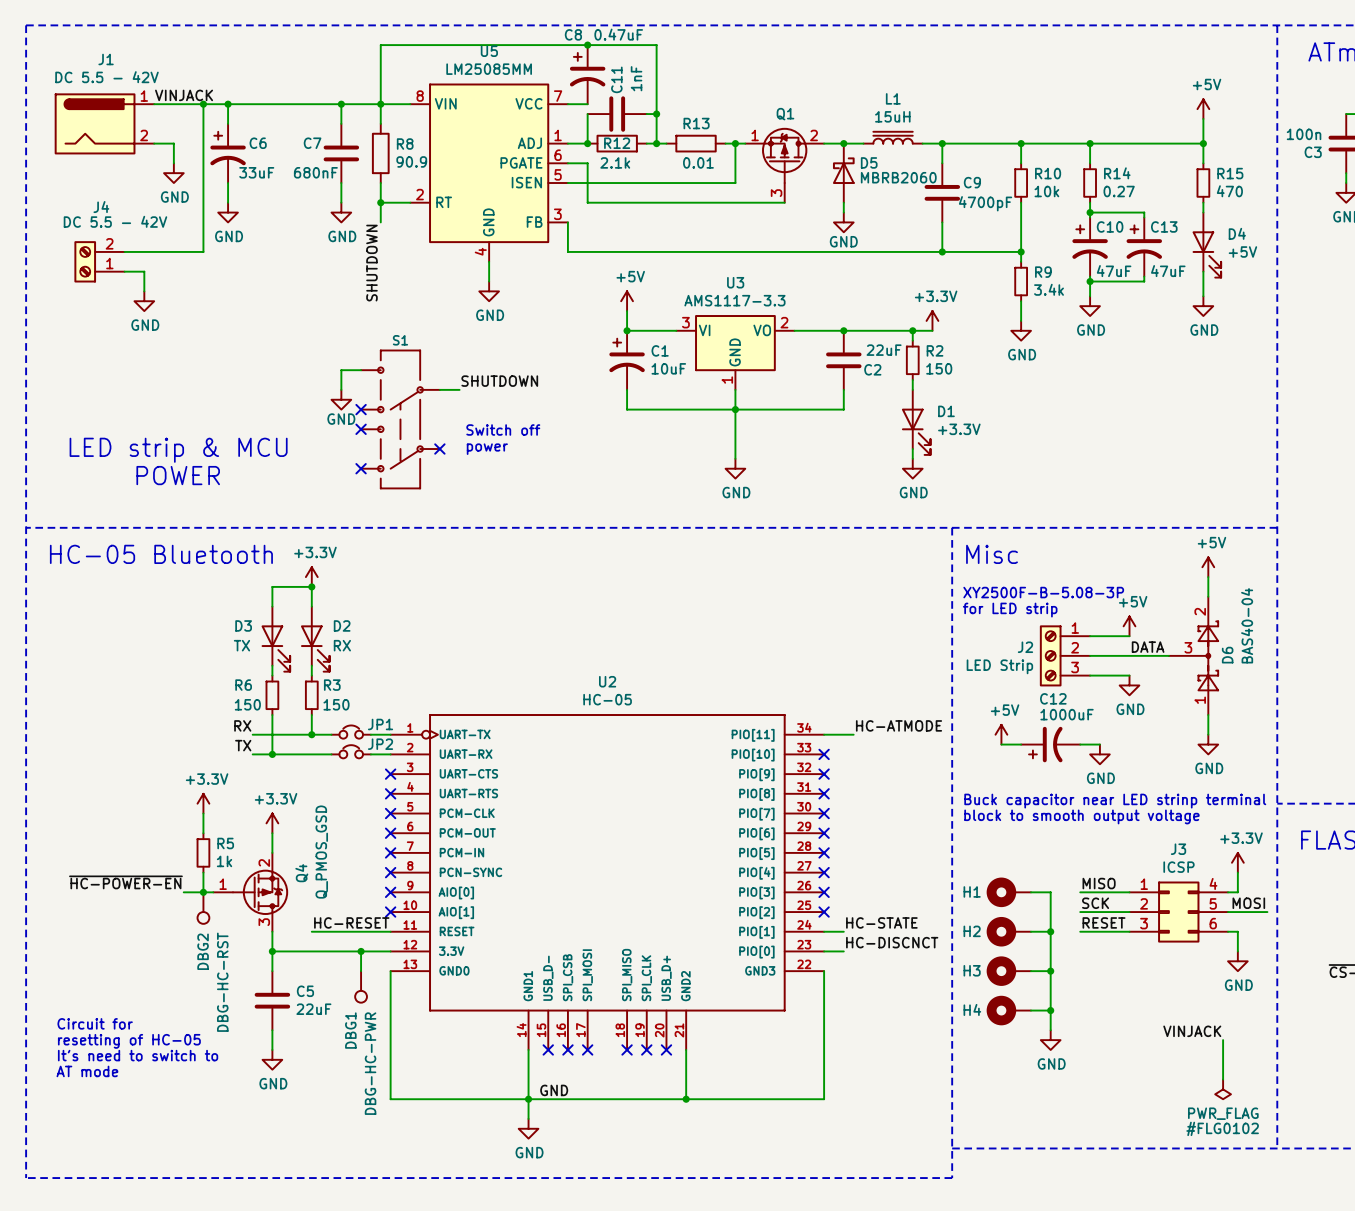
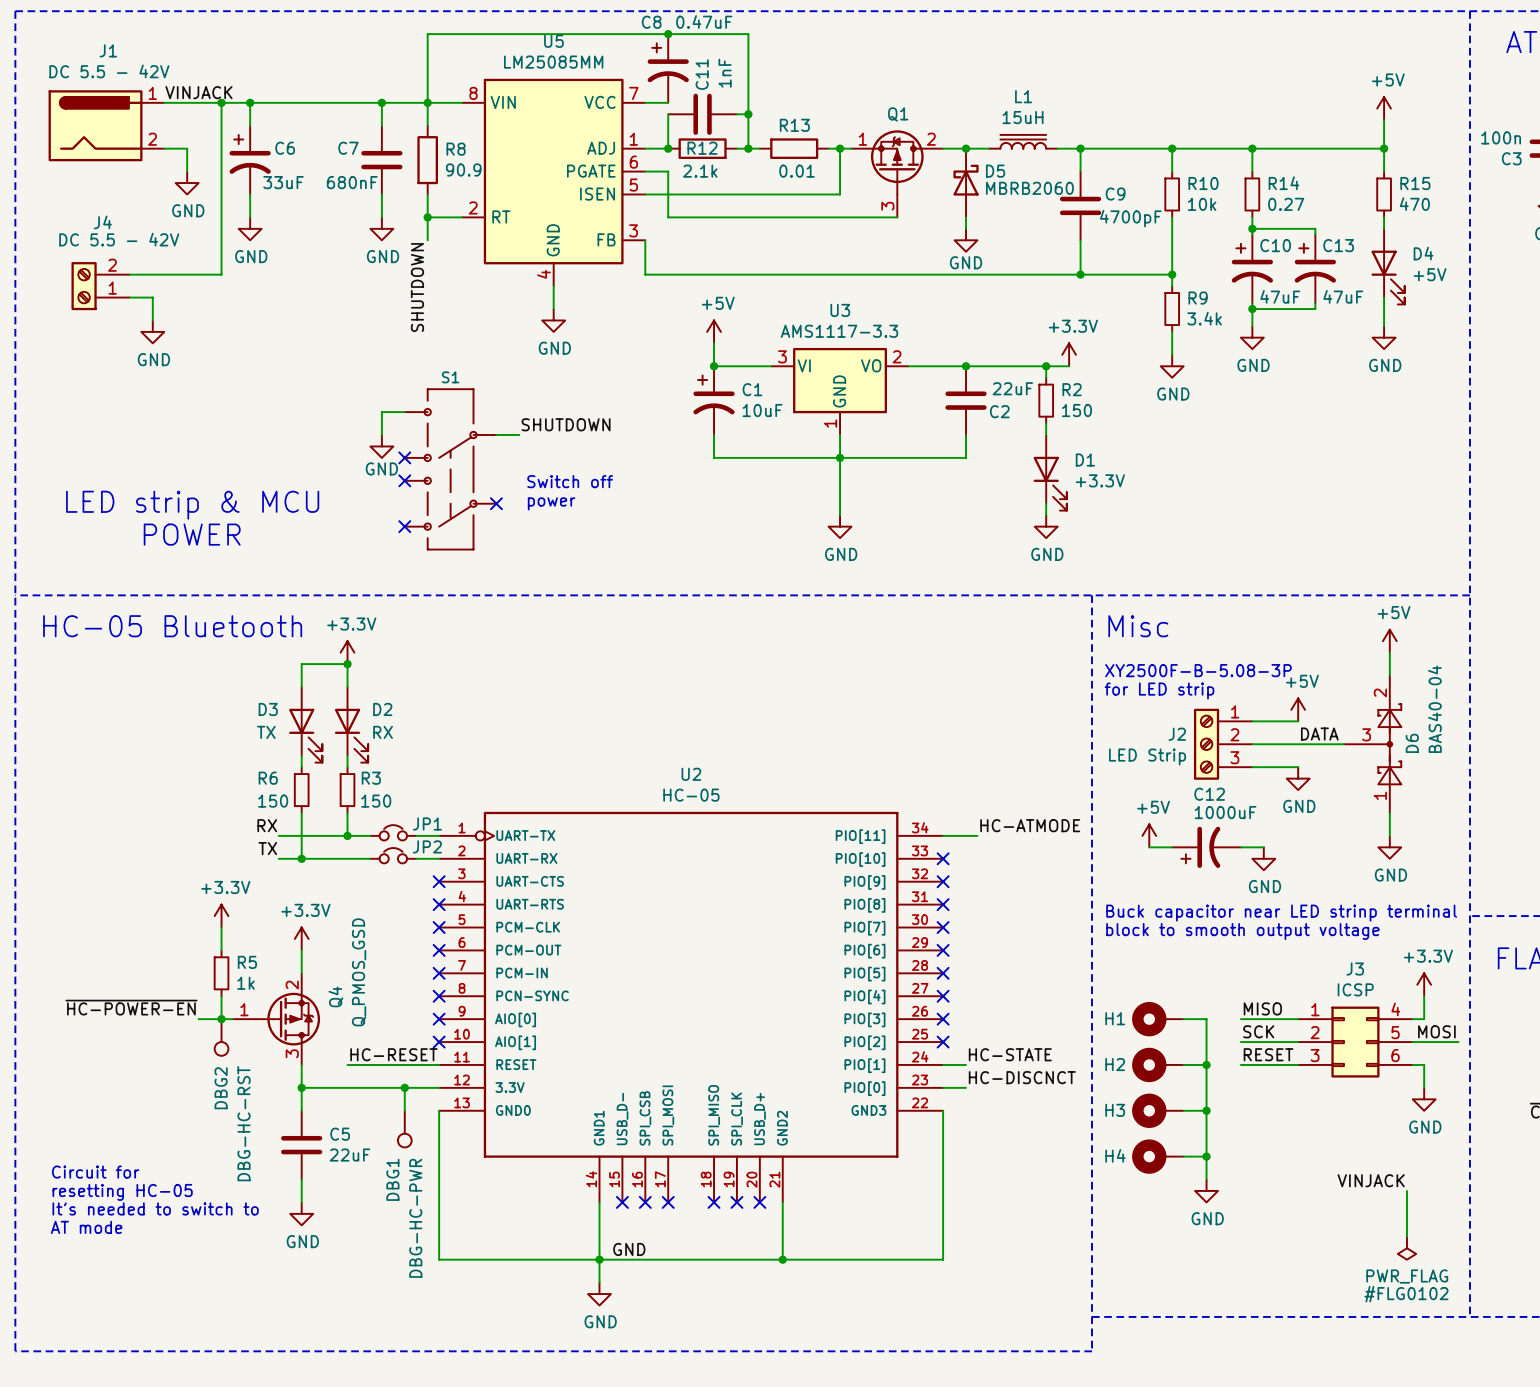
text: resetting of HC-05 (129, 1041) -> resetting HC-05 (122, 1192)
text: It's need to switch to (138, 1055) -> It's needed to switch to (155, 1208)

